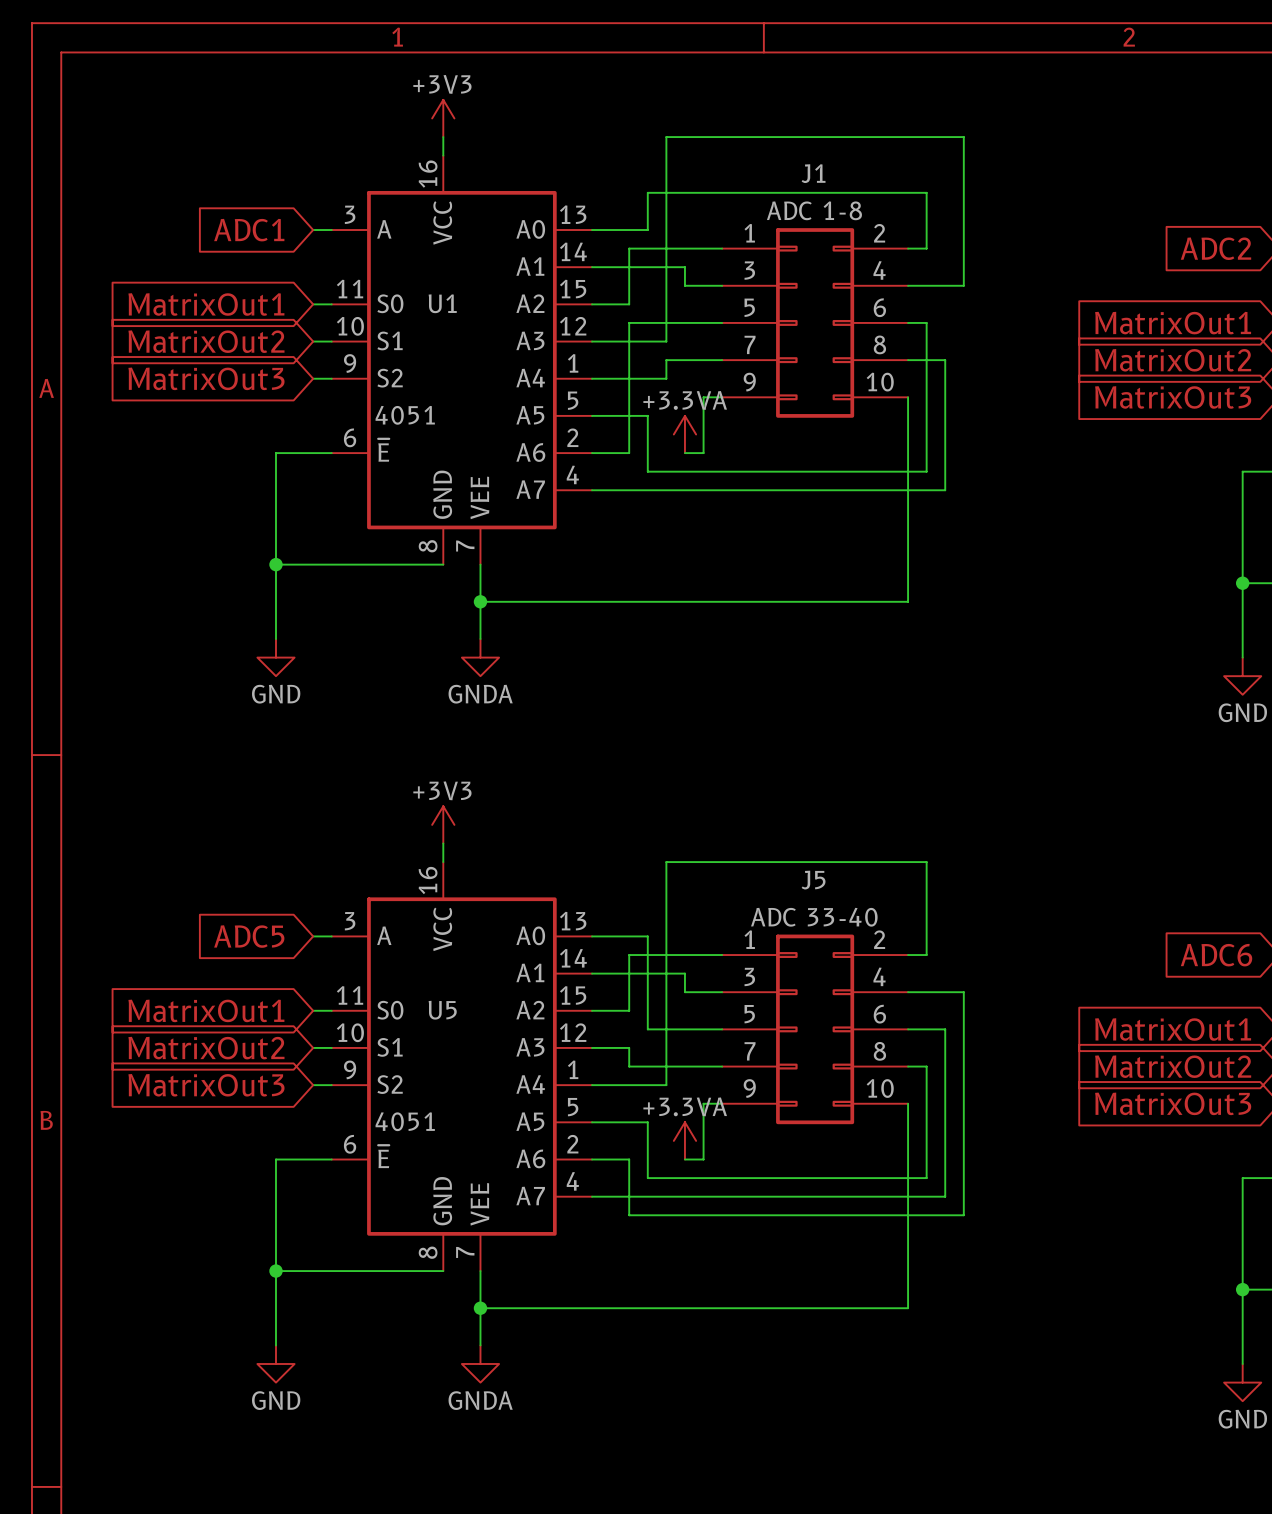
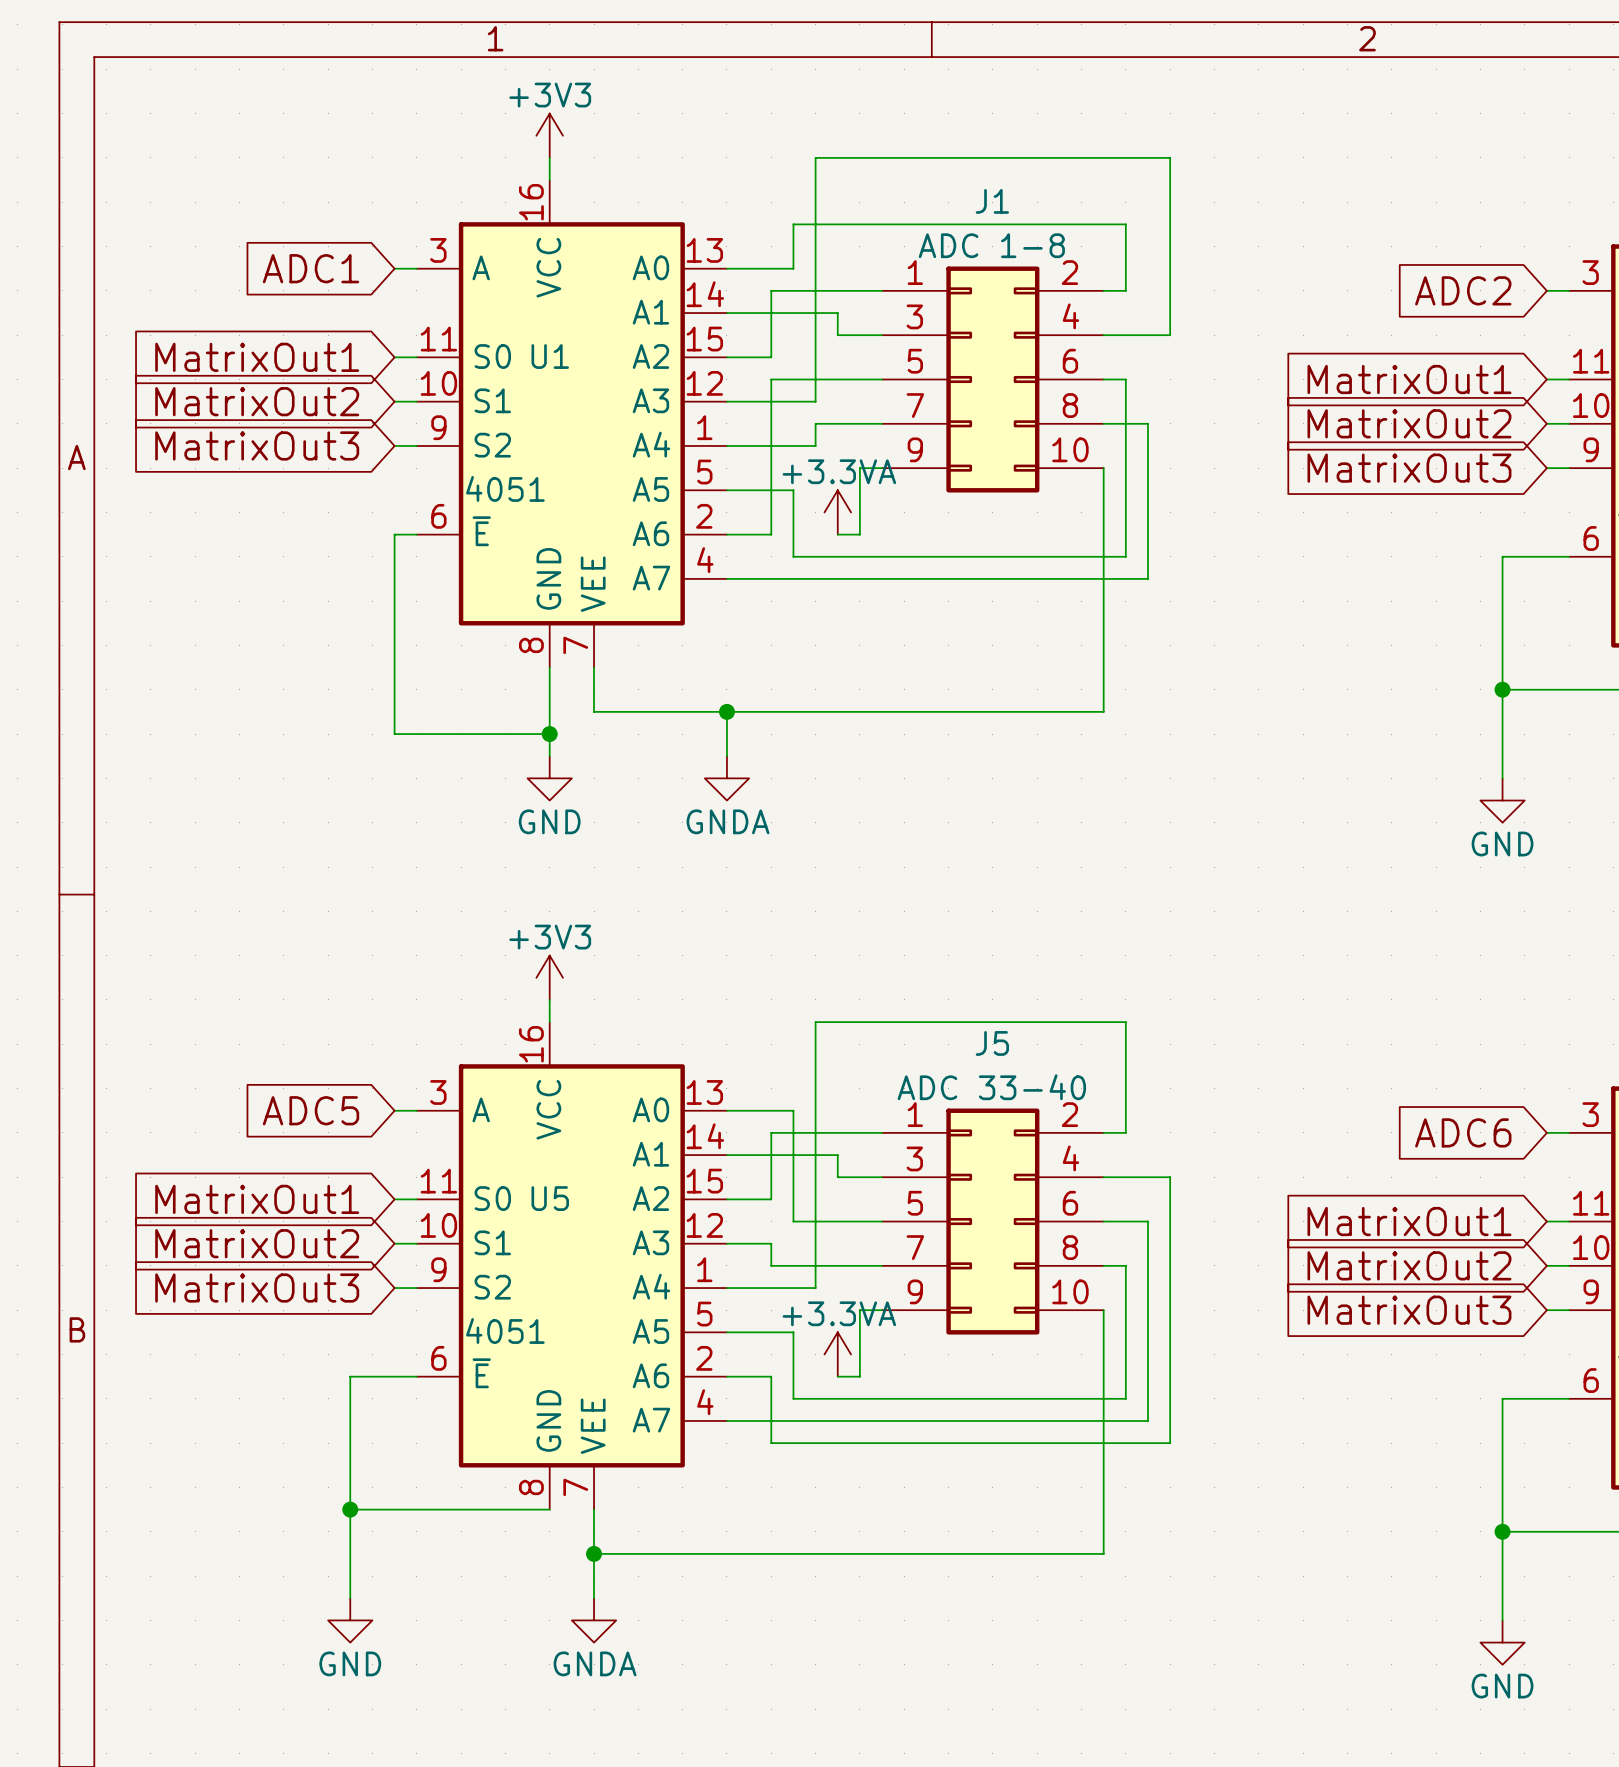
wire: (313, 453) (275, 453) (275, 638) -> (394, 534) (394, 734) (549, 734)
wire: (275, 564) (443, 564) -> (549, 756) (549, 667)
junction: (275, 564) -> none
wire: (480, 601) (480, 638) -> (726, 711) (726, 756)
junction position: (480, 601) -> (549, 734)
junction: none -> (726, 711)
power symbol position: GND (275, 657) -> GND (549, 778)
power symbol position: GNDA (480, 657) -> GNDA (726, 778)

